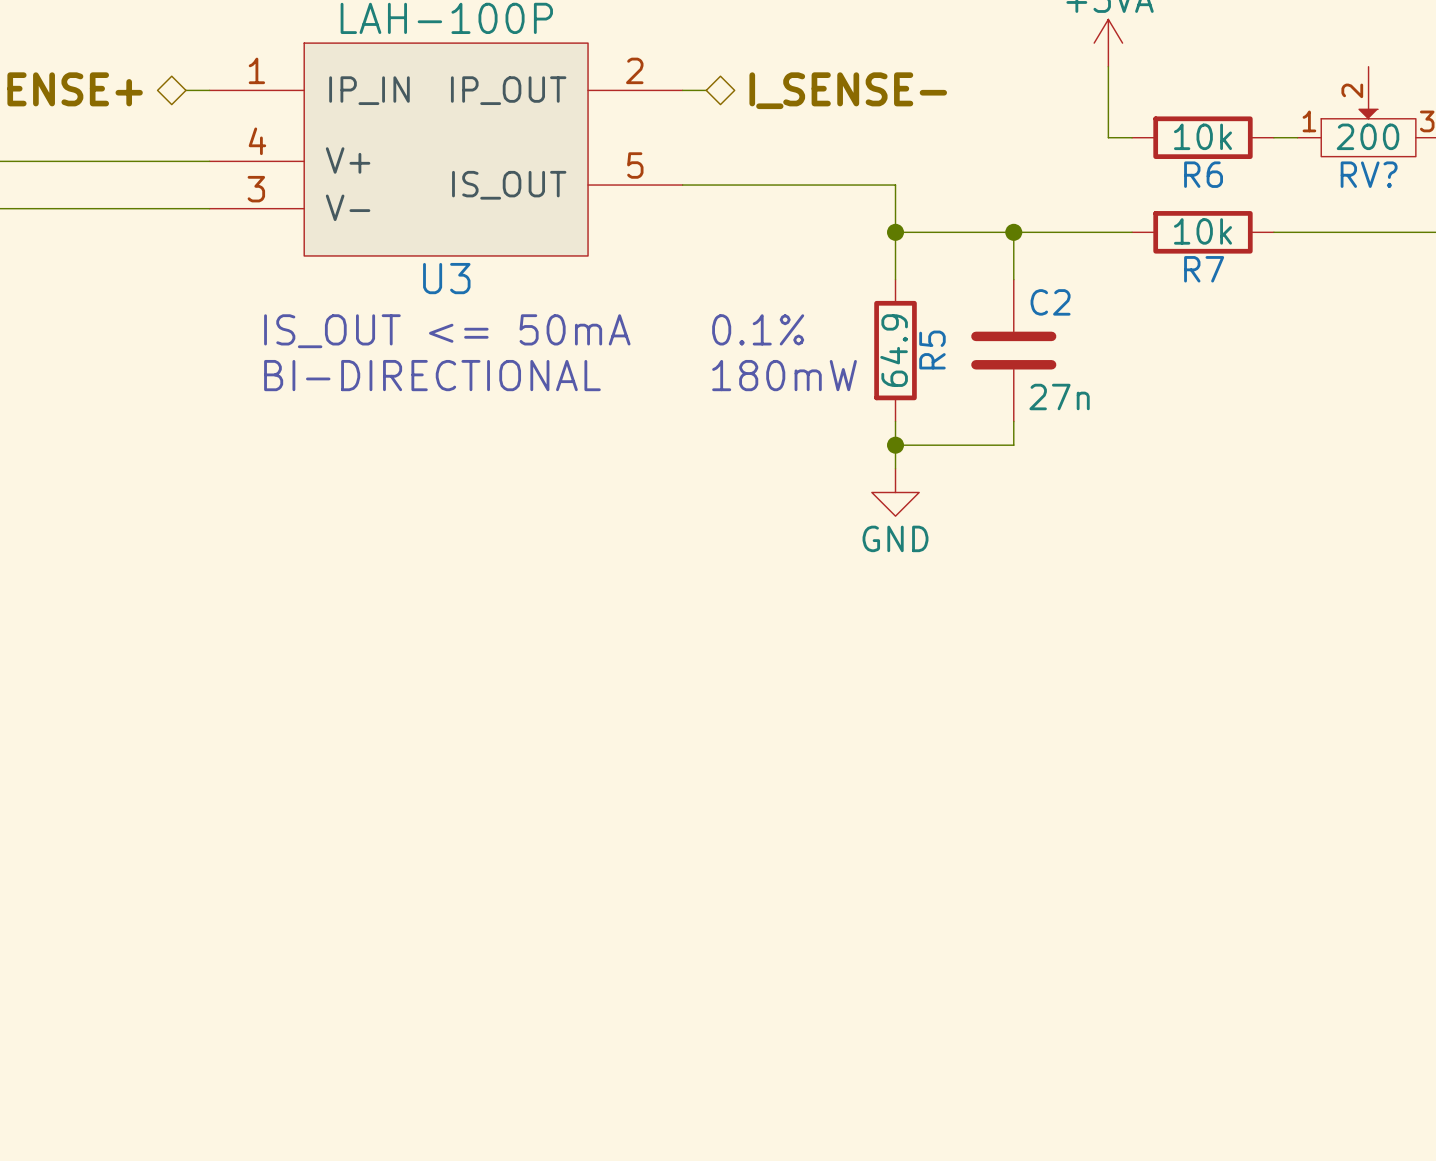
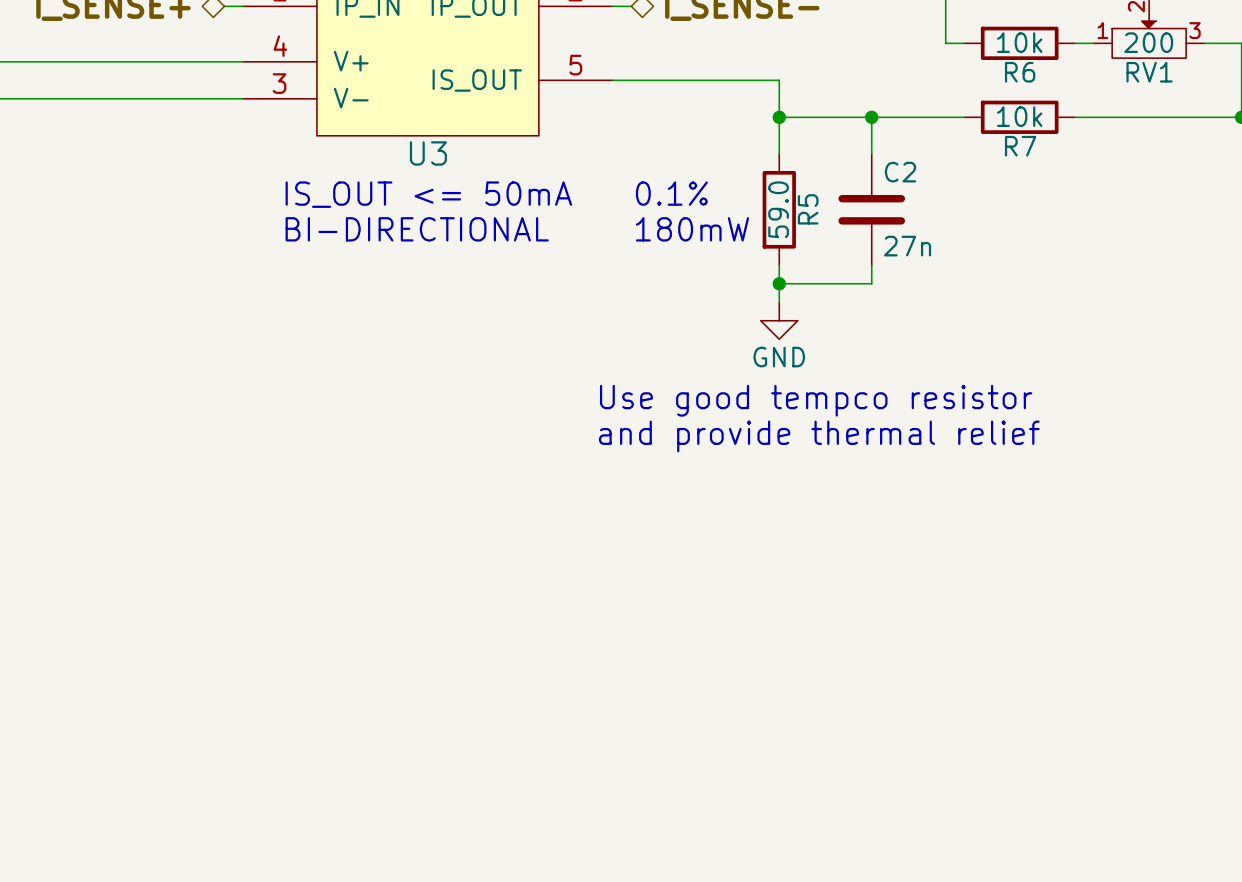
RV? name: RV? (1369, 174) -> RV1 (1149, 72)
R5 value: 64.9 (894, 350) -> 59.0 (778, 209)
text: none -> Use good tempco resistor (816, 400)
text: none -> and provide thermal relief (819, 436)

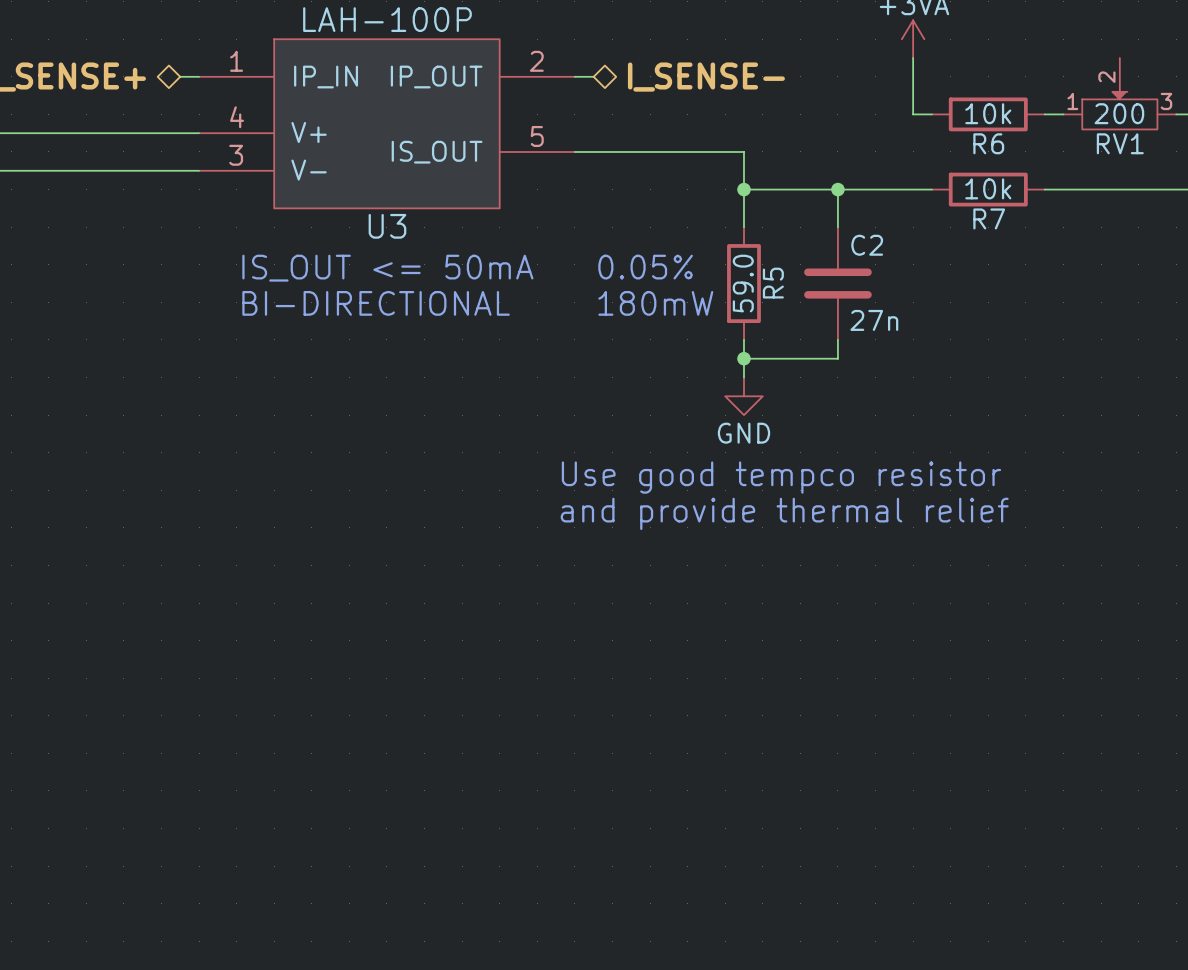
text: 0.1% (671, 193) -> 0.05% (645, 267)

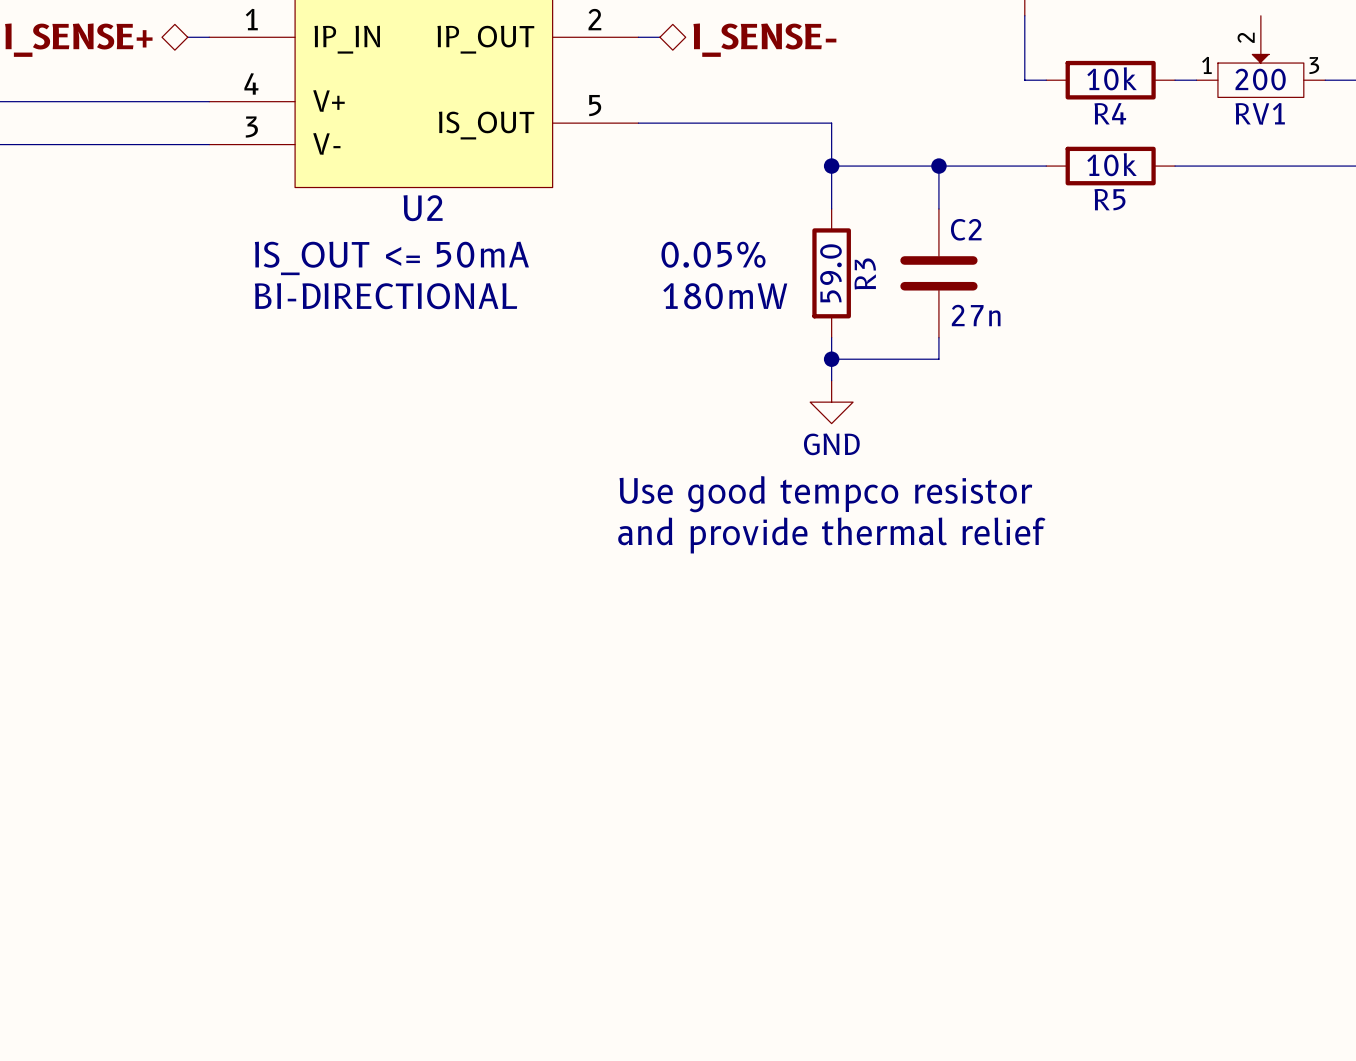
R6 name: R6 (988, 143) -> R4 (1110, 113)
R7 name: R7 (989, 218) -> R5 (1109, 199)
U3 name: U3 (387, 226) -> U2 (423, 208)
R5 name: R5 (773, 283) -> R3 (865, 273)

